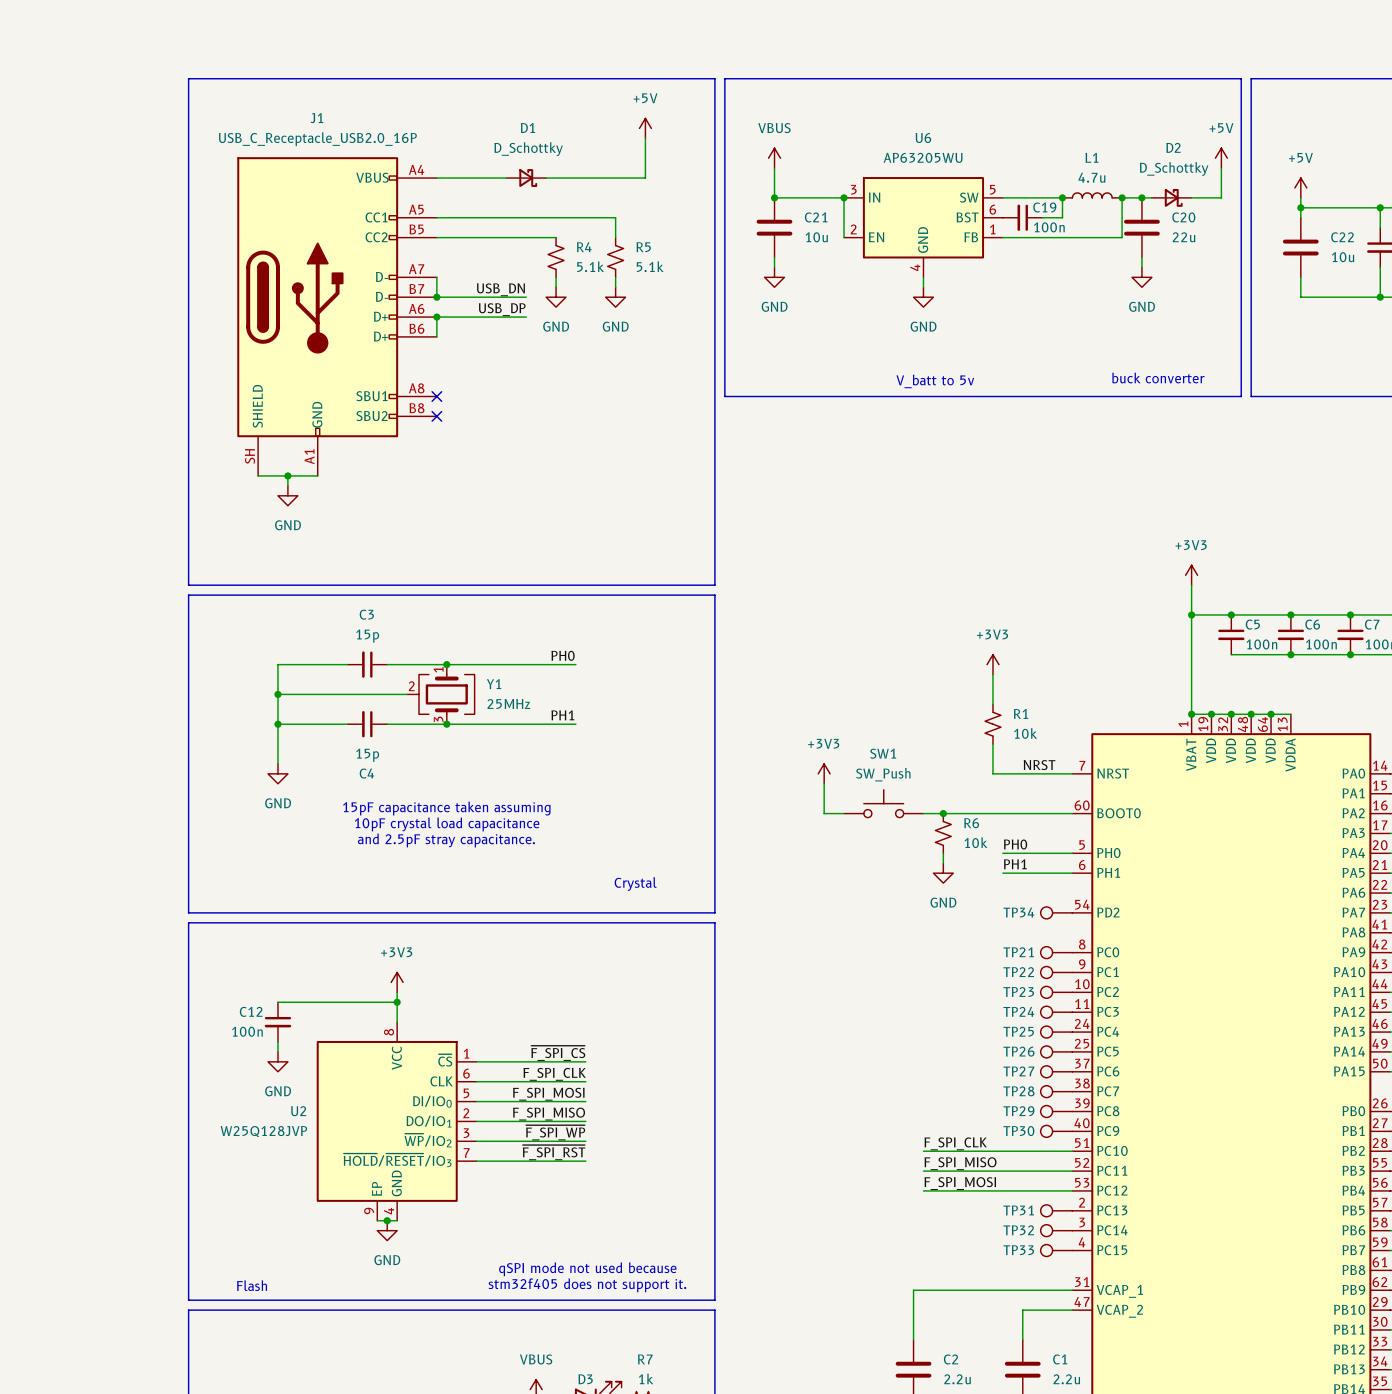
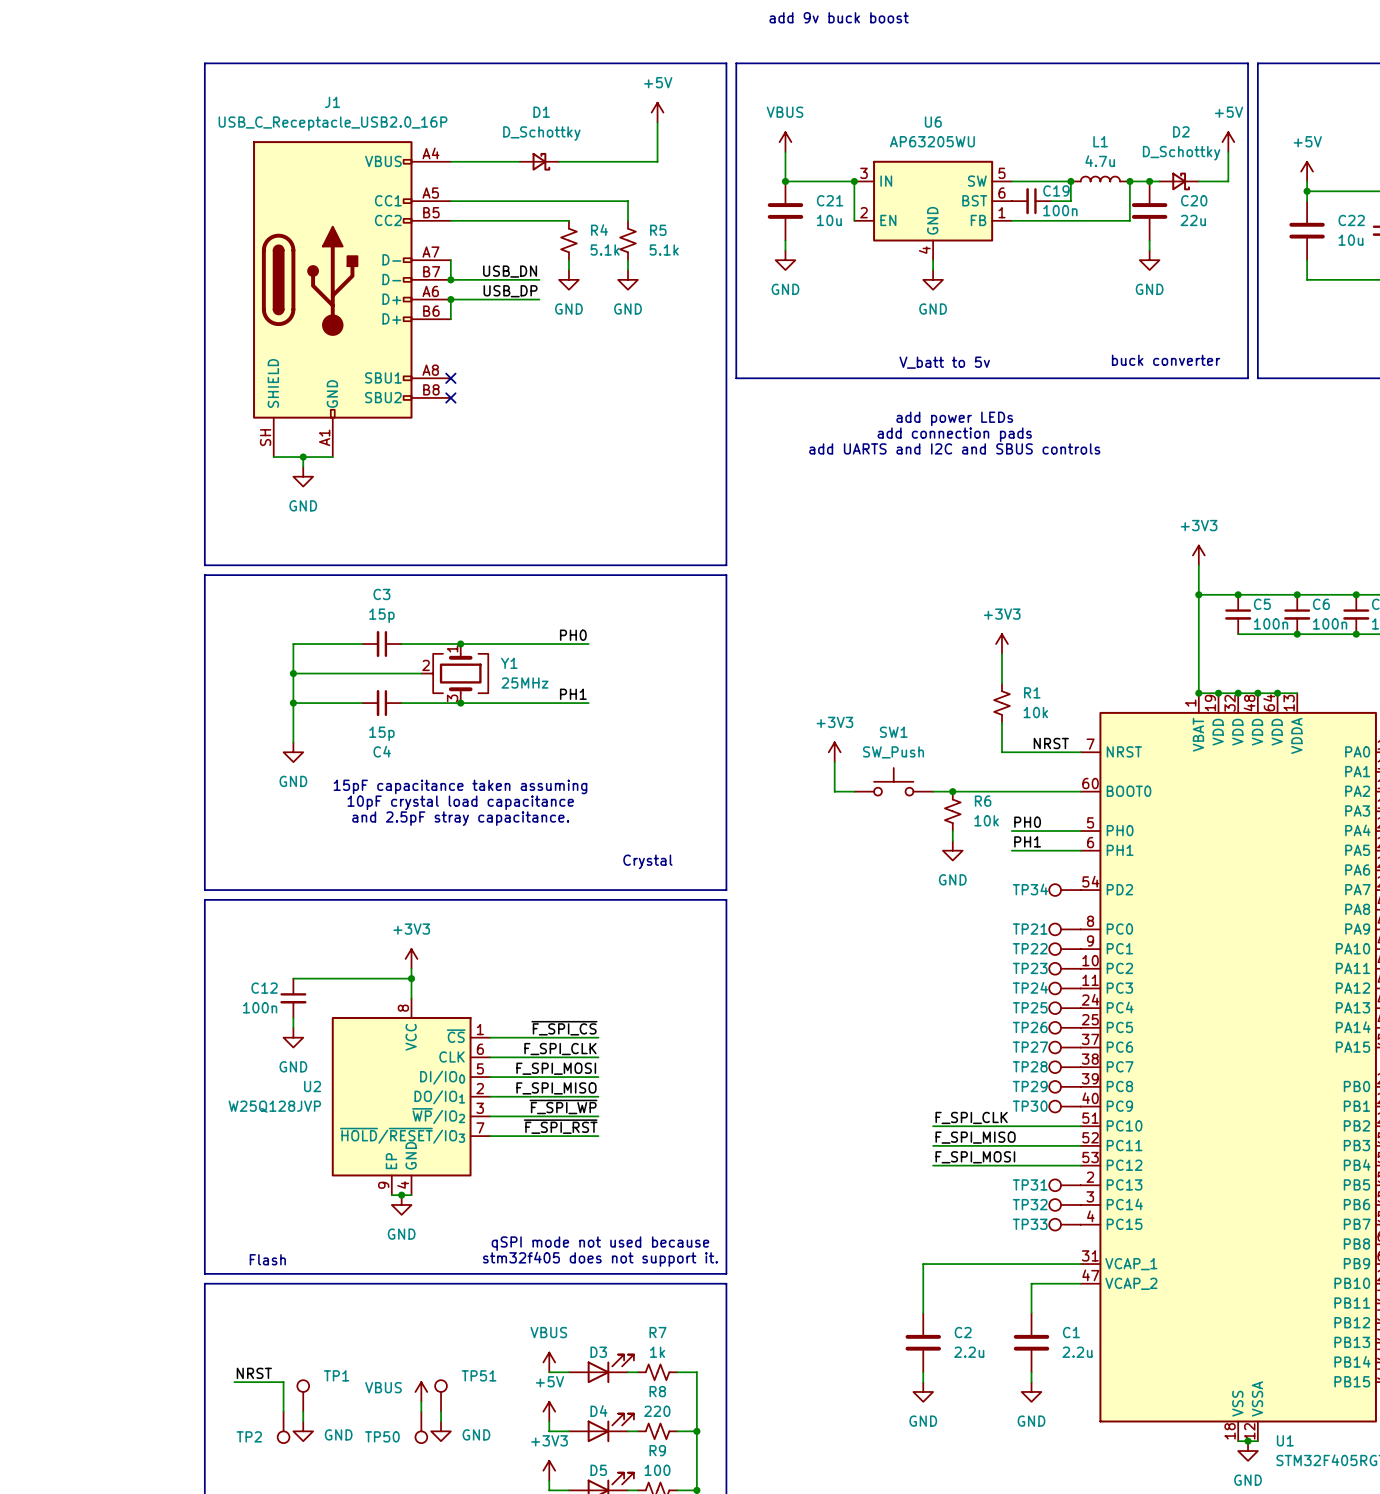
text: none -> add 9v buck boost (839, 17)
text: none -> add power LEDs (954, 418)
text: none -> add connection pads (954, 434)
text: none -> add UARTS and I2C and SBUS controls (954, 448)

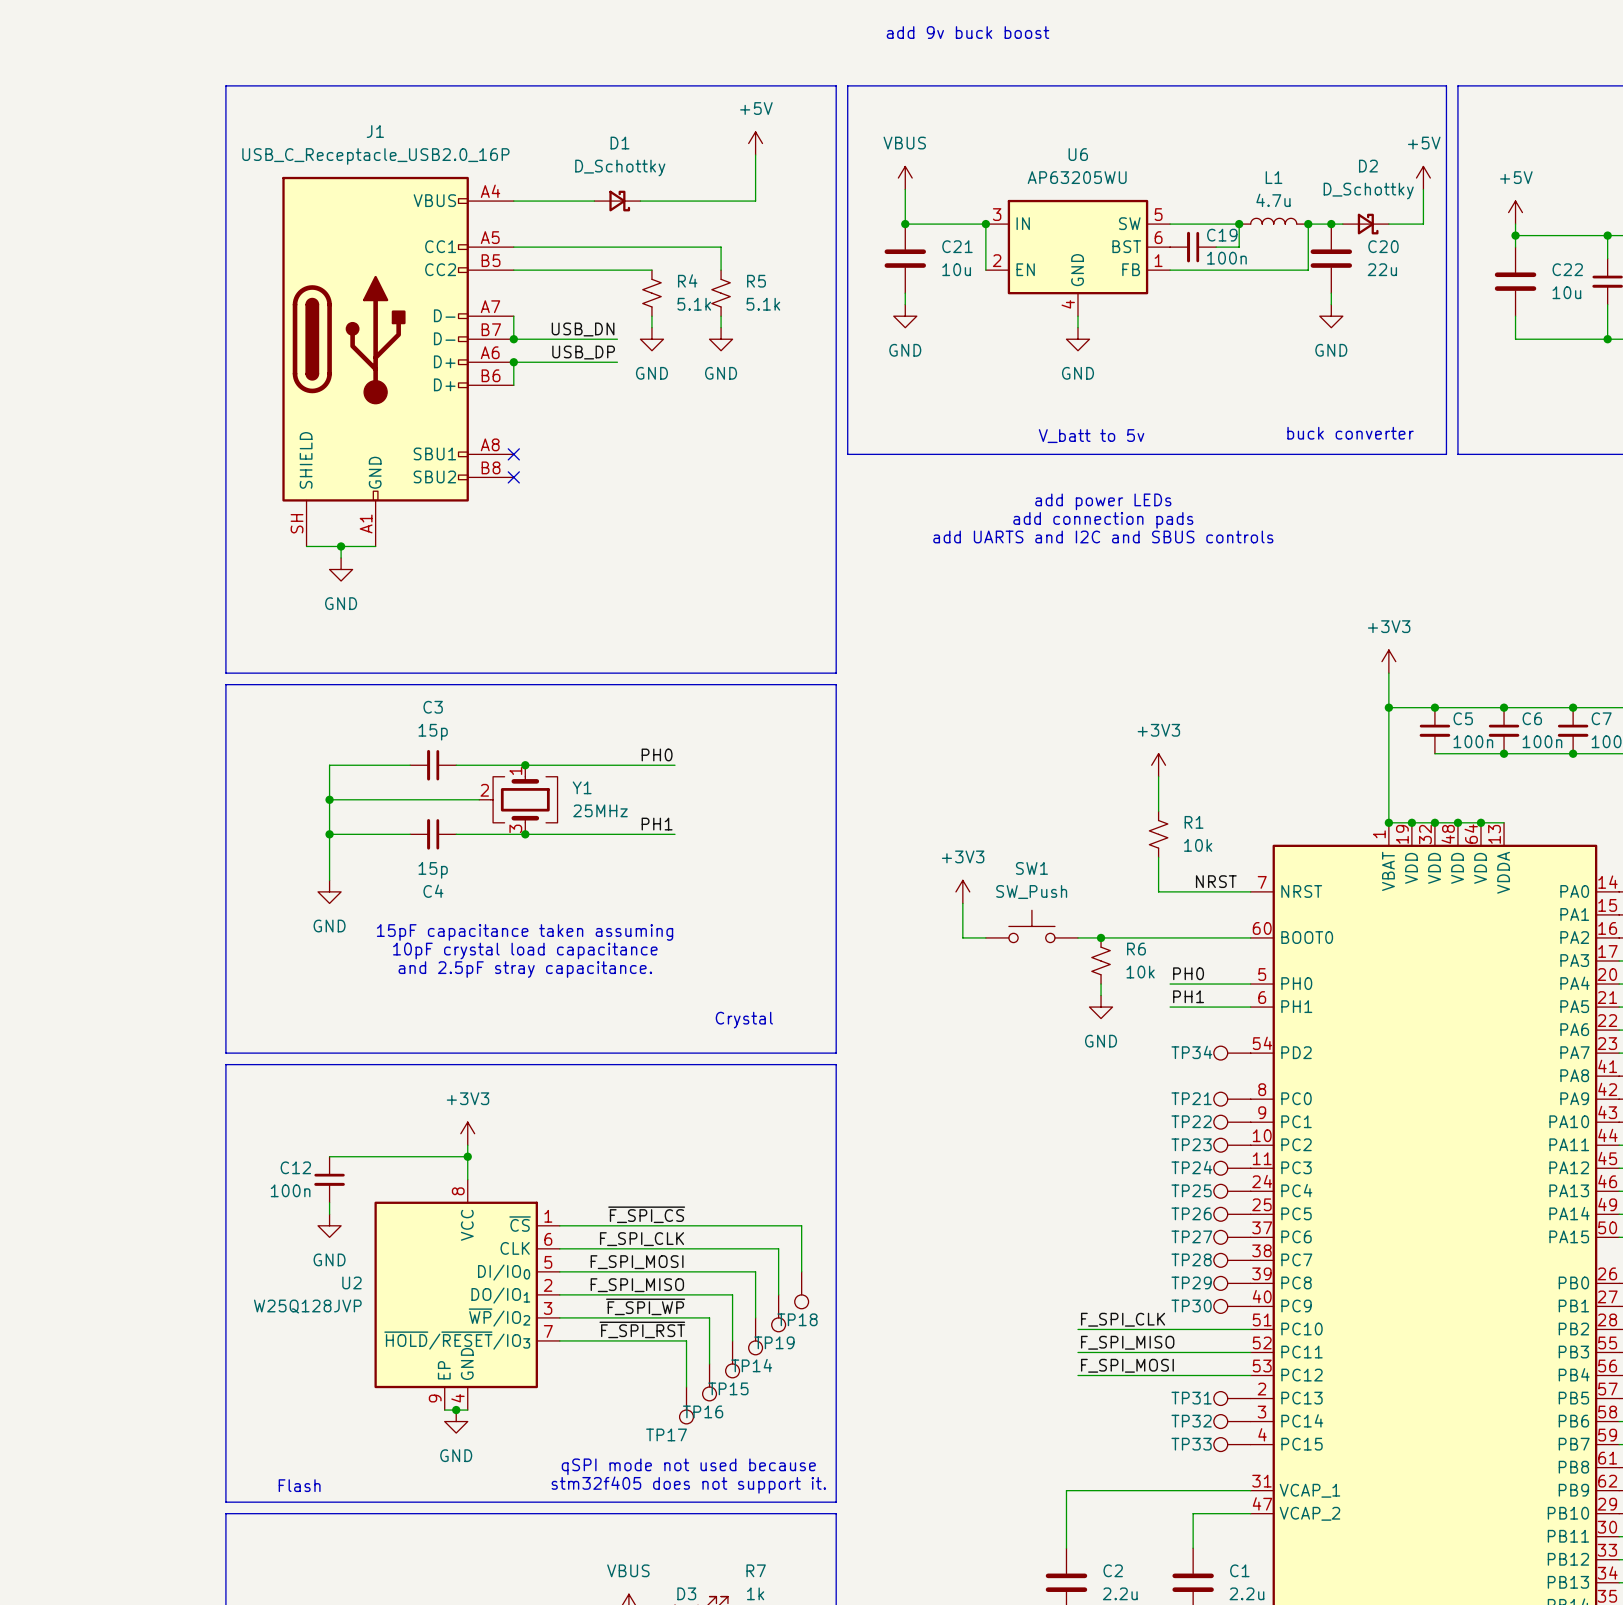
wire: none -> (686, 1225) (801, 1225) (801, 1271)
wire: none -> (686, 1248) (778, 1248) (778, 1294)
wire: none -> (686, 1271) (755, 1271) (755, 1317)
TP18: none -> (801, 1290)
wire: none -> (686, 1294) (732, 1294) (732, 1340)
TP19: none -> (778, 1313)
wire: none -> (686, 1317) (709, 1317) (709, 1363)
TP14: none -> (755, 1336)
wire: none -> (686, 1340) (686, 1387)
TP15: none -> (732, 1359)
TP16: none -> (709, 1382)
TP17: none -> (686, 1405)

